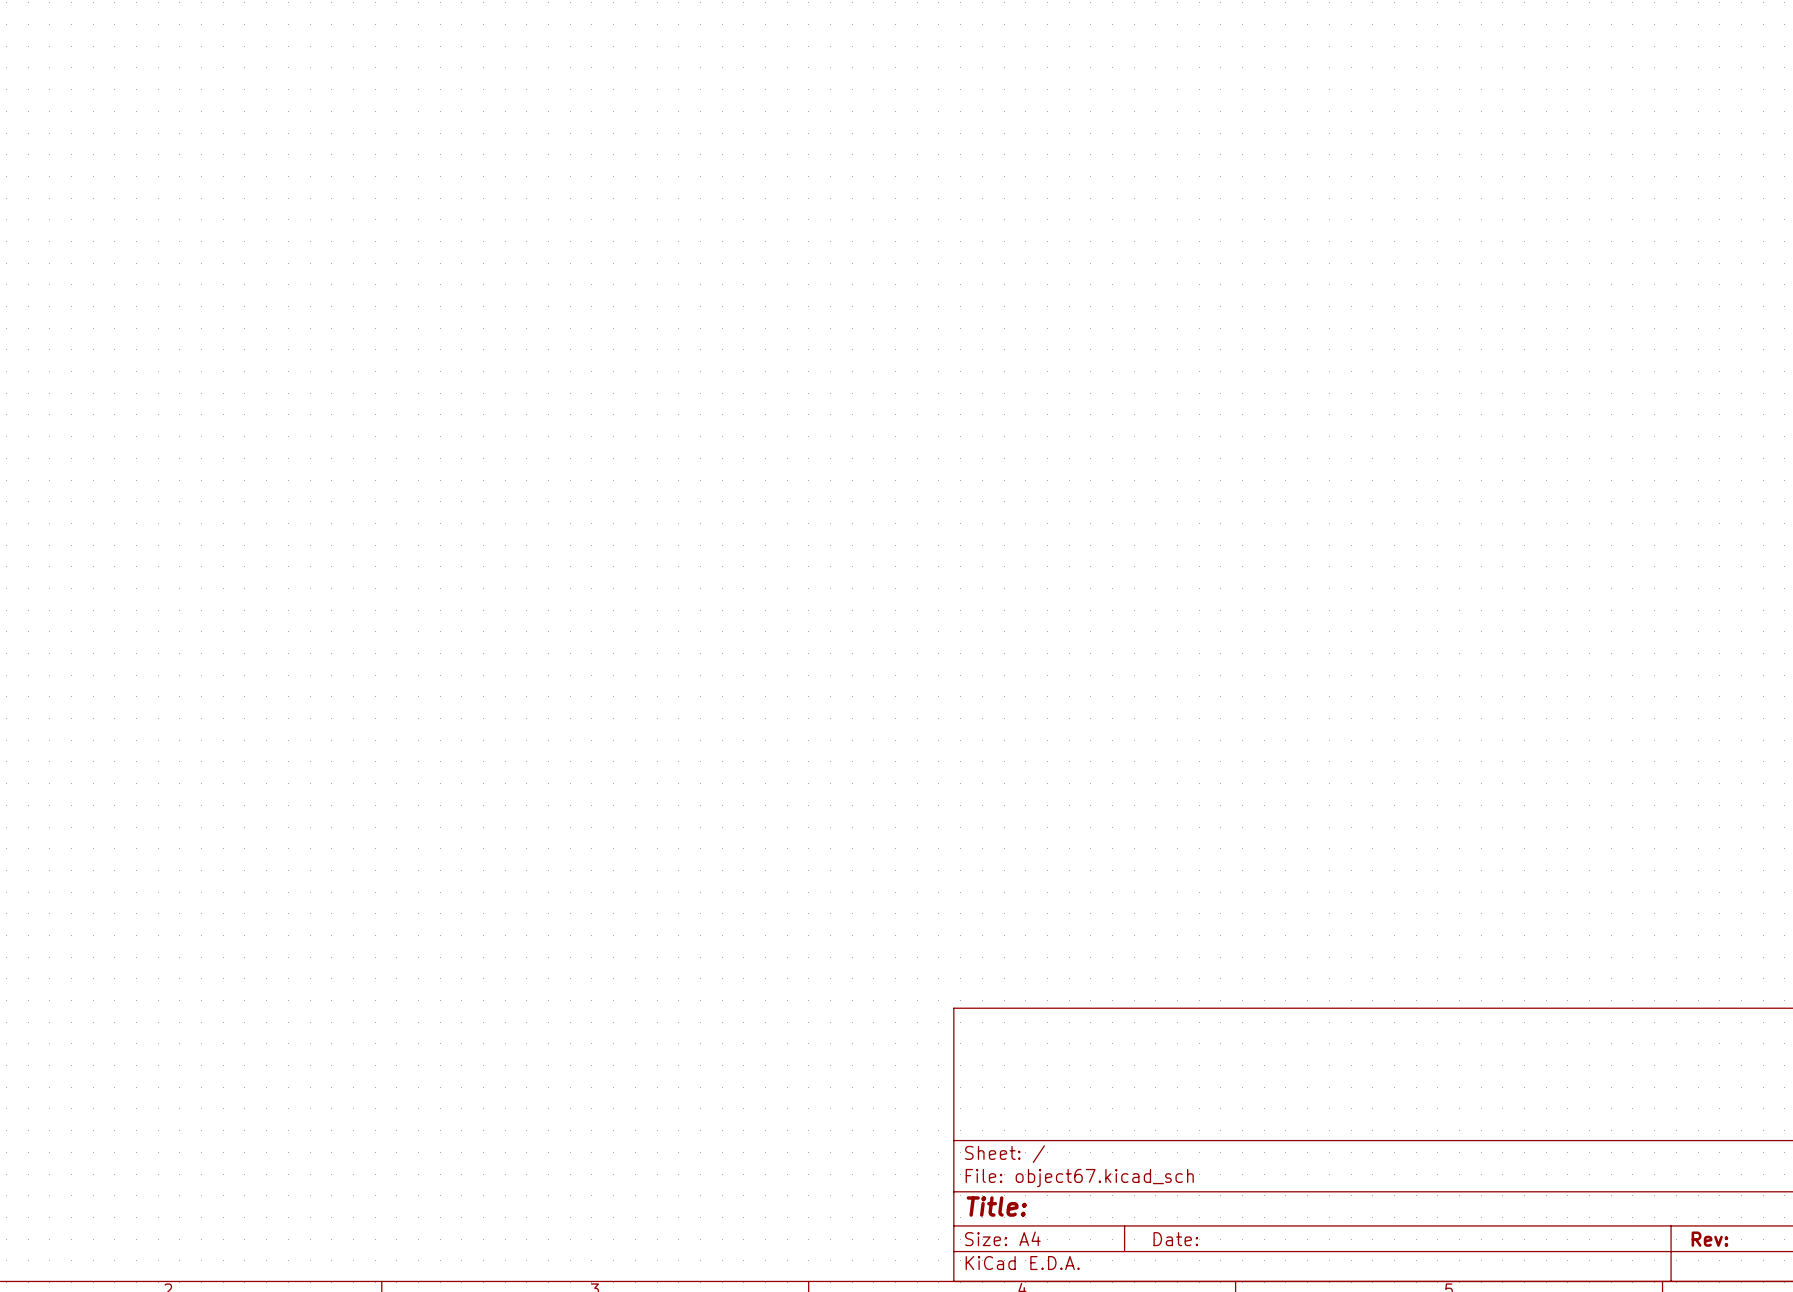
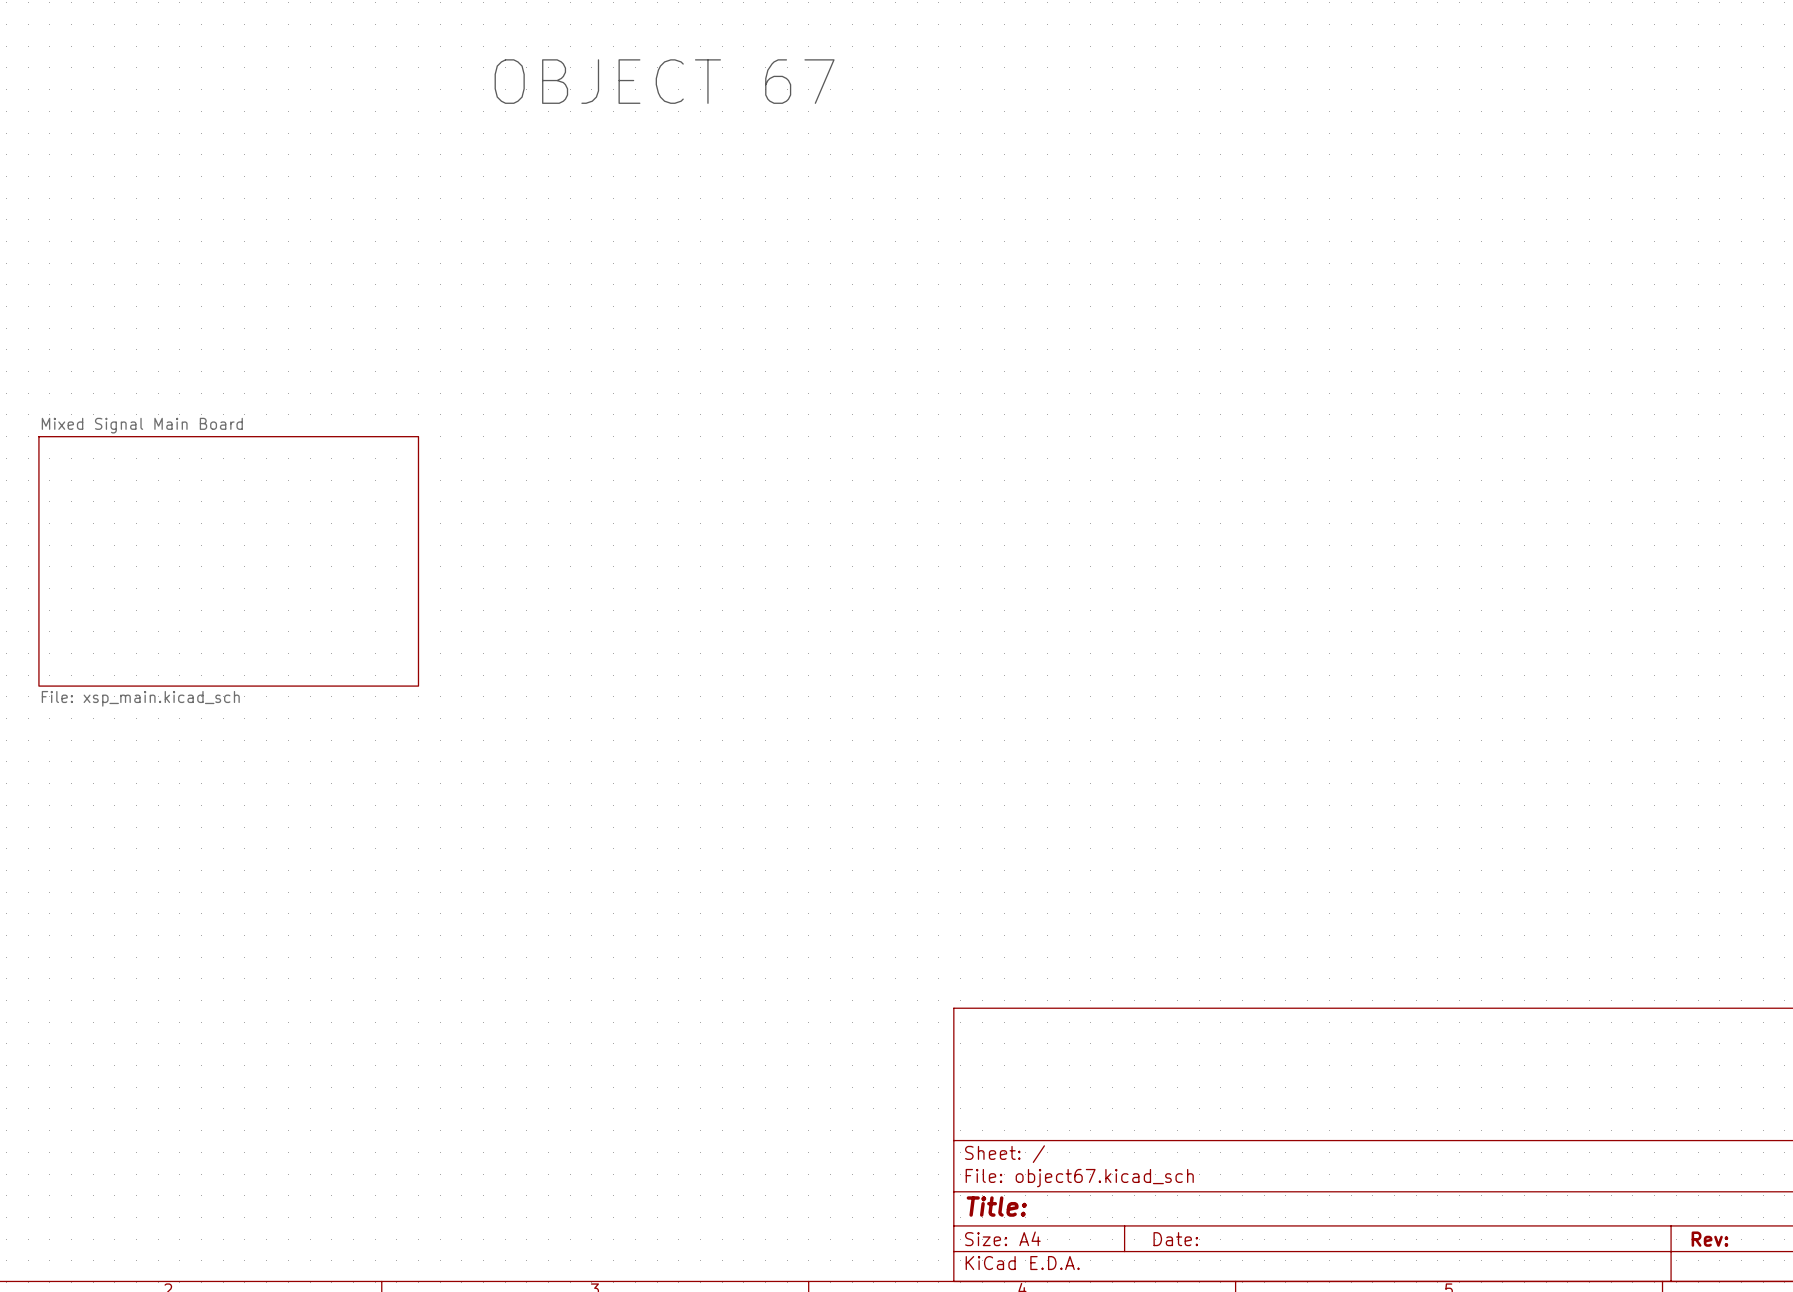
text: none -> OBJECT 67 (664, 81)
sheet Mixed Signal Main Board: none -> File: xsp_main.kicad_sch (228, 561)

